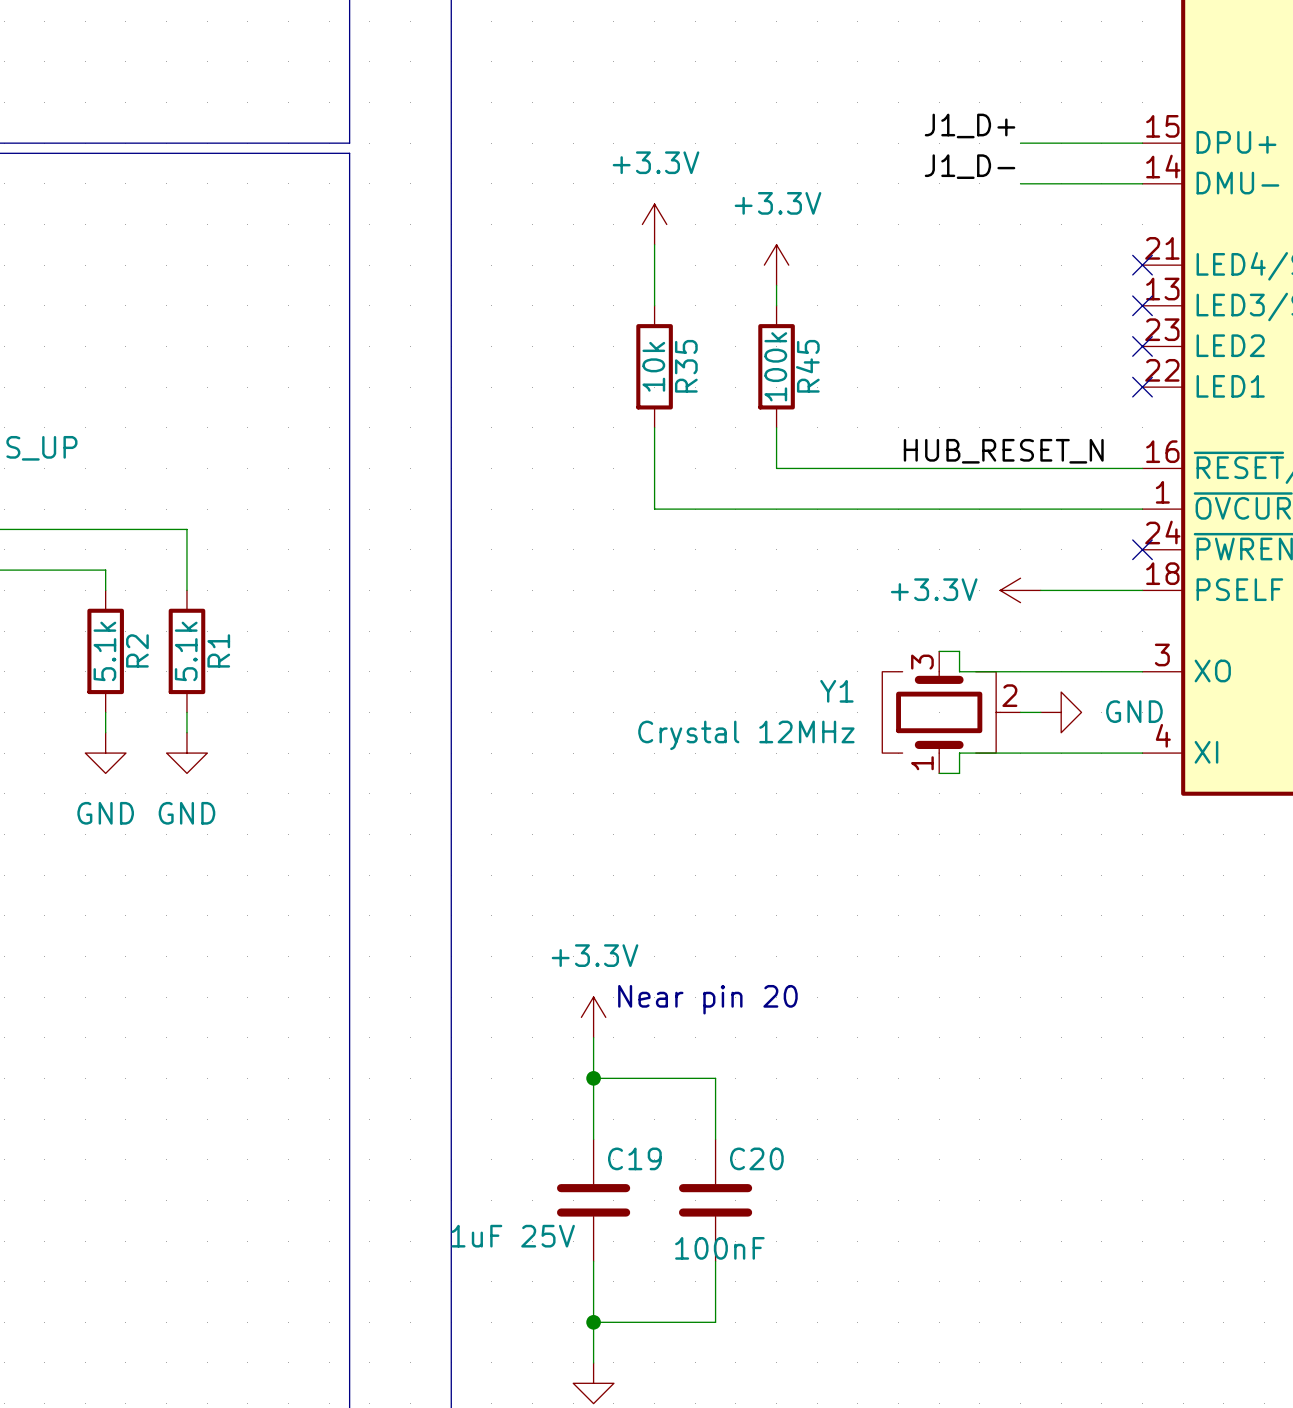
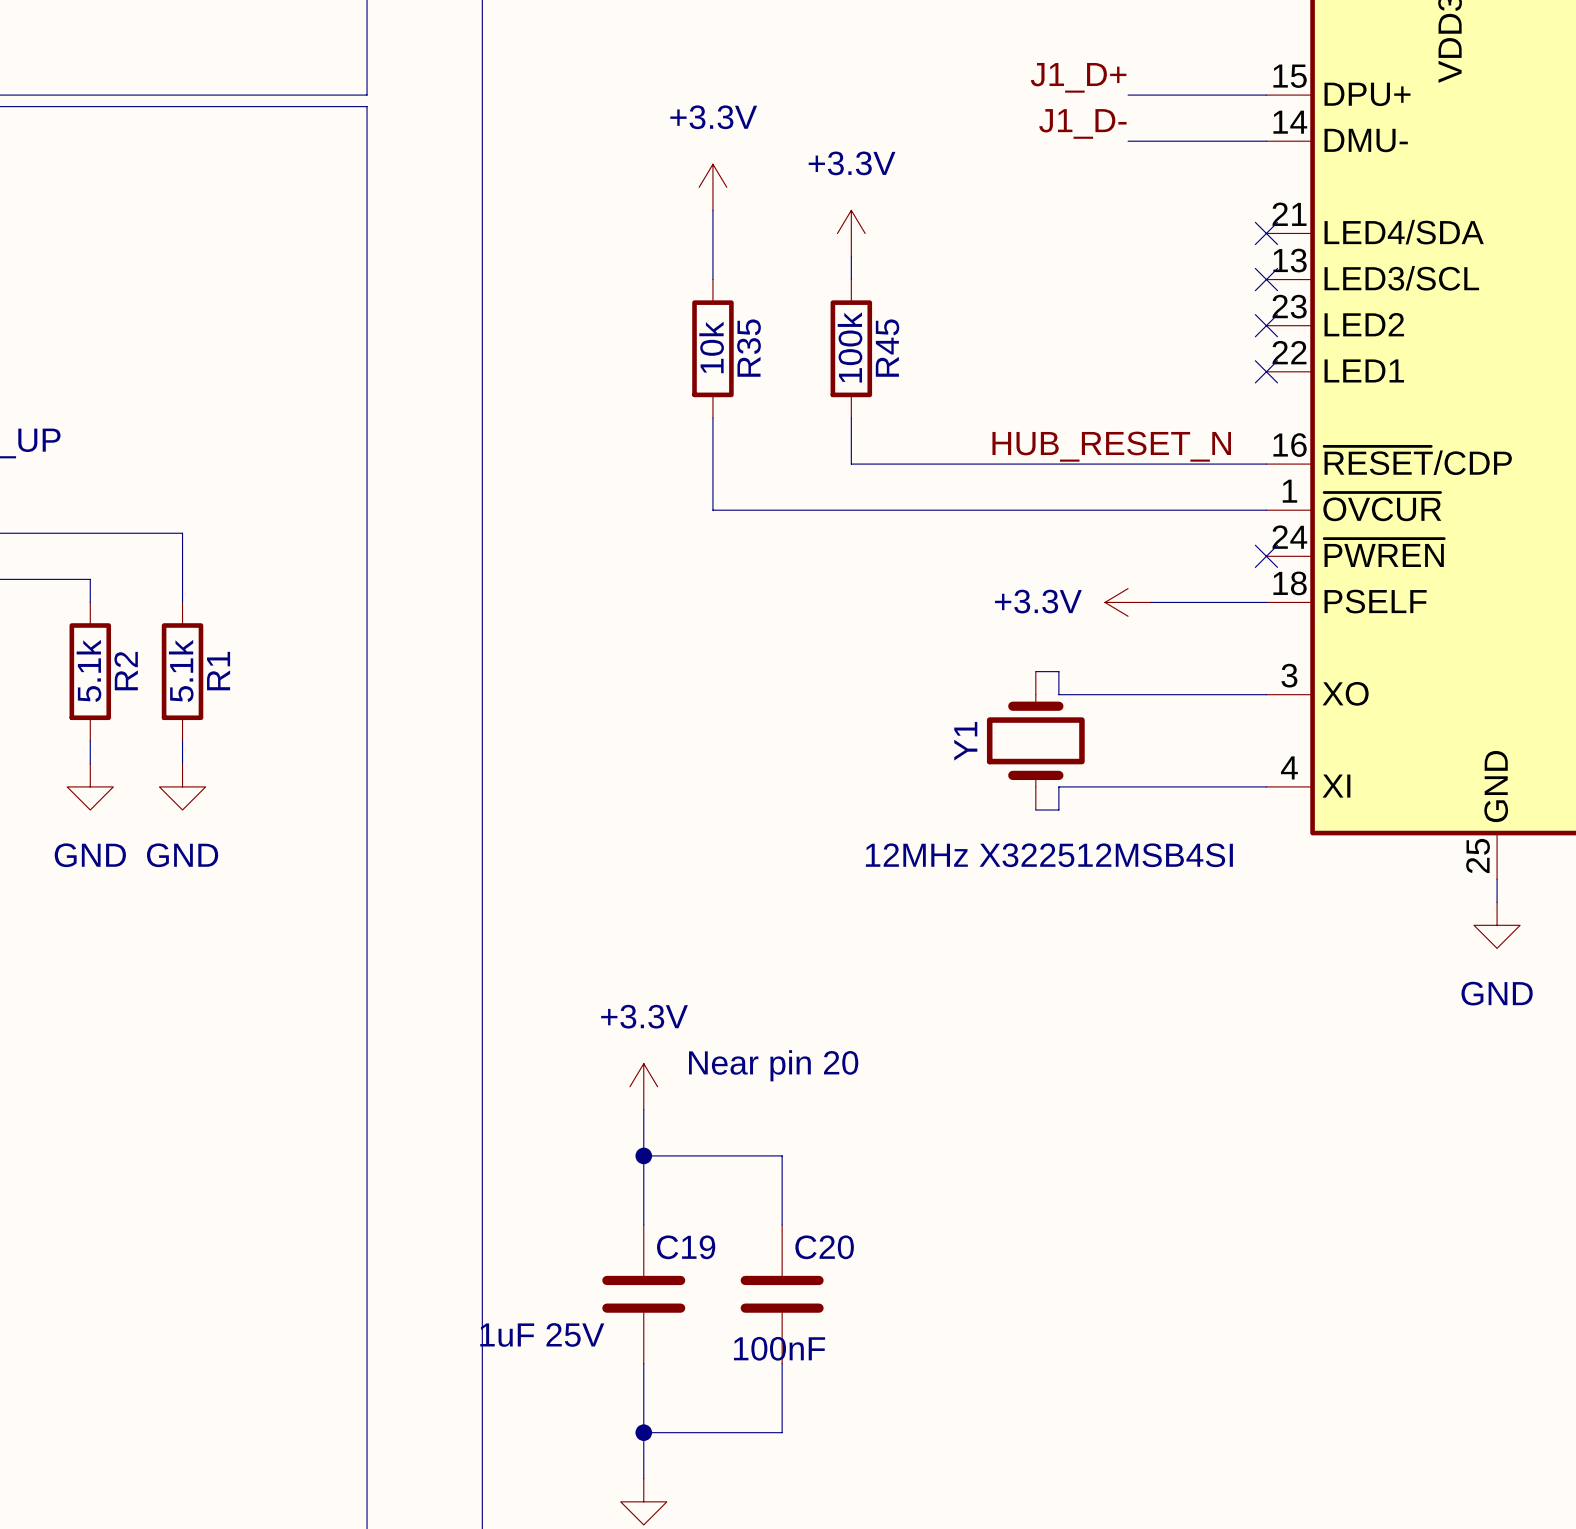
Y1 symbol: [882, 651, 1021, 774] -> [986, 671, 1085, 811]
Y1 name position: Y1 (836, 691) -> Y1 (965, 741)
wire: (1020, 712) (1040, 712) -> none
power symbol: GND (1061, 712) -> none
Y1 value: Crystal 12MHz (746, 735) -> 12MHz X322512MSB4SI (1049, 855)

